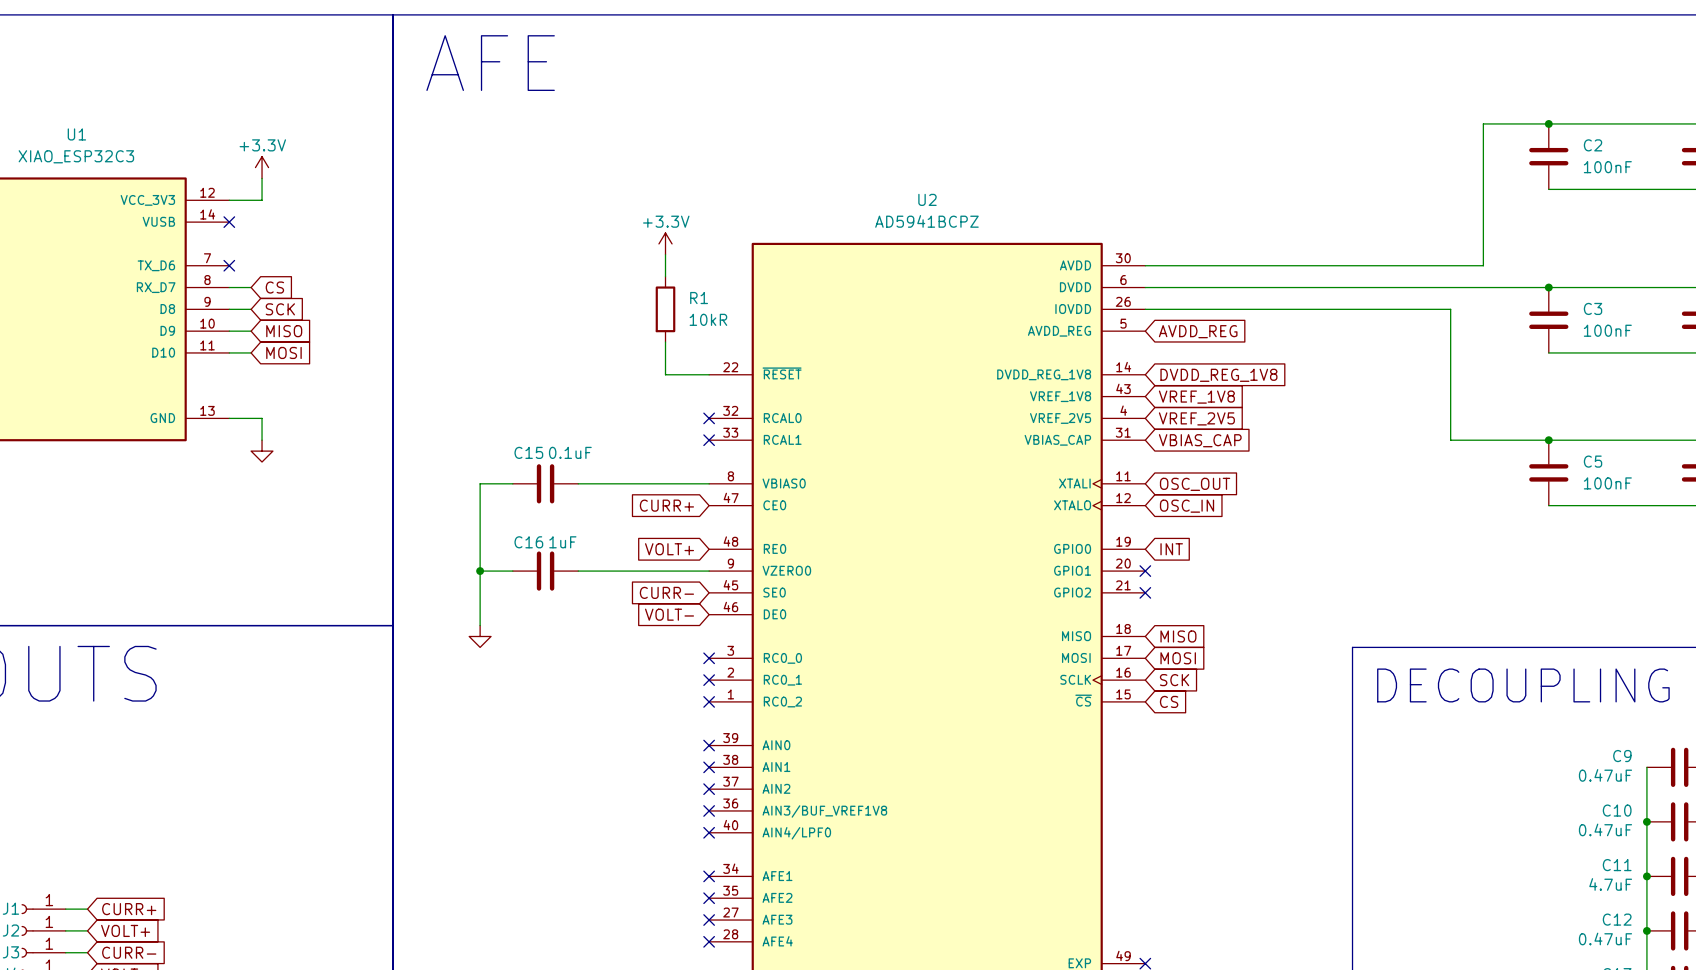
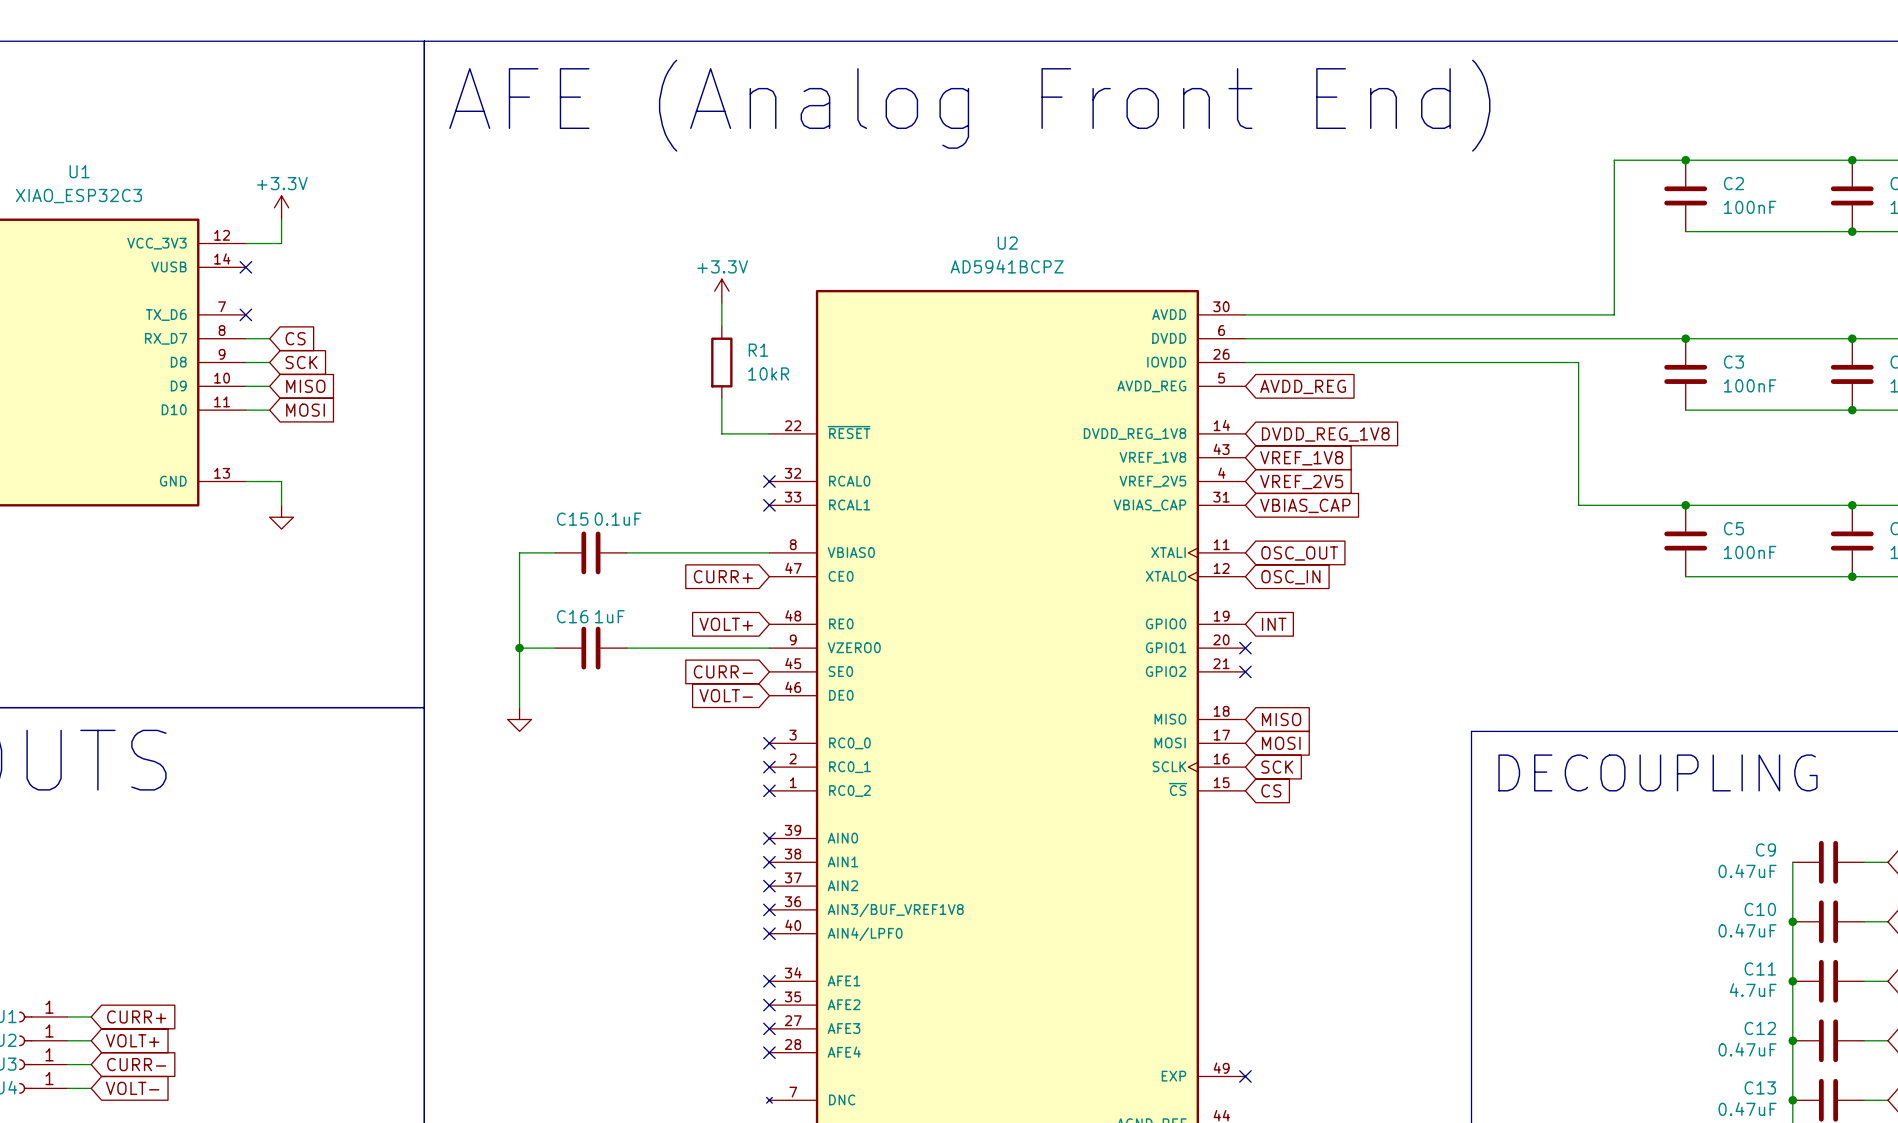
text: AFE (490, 63) -> none
text: none -> AFE (Analog Front End) (969, 105)

